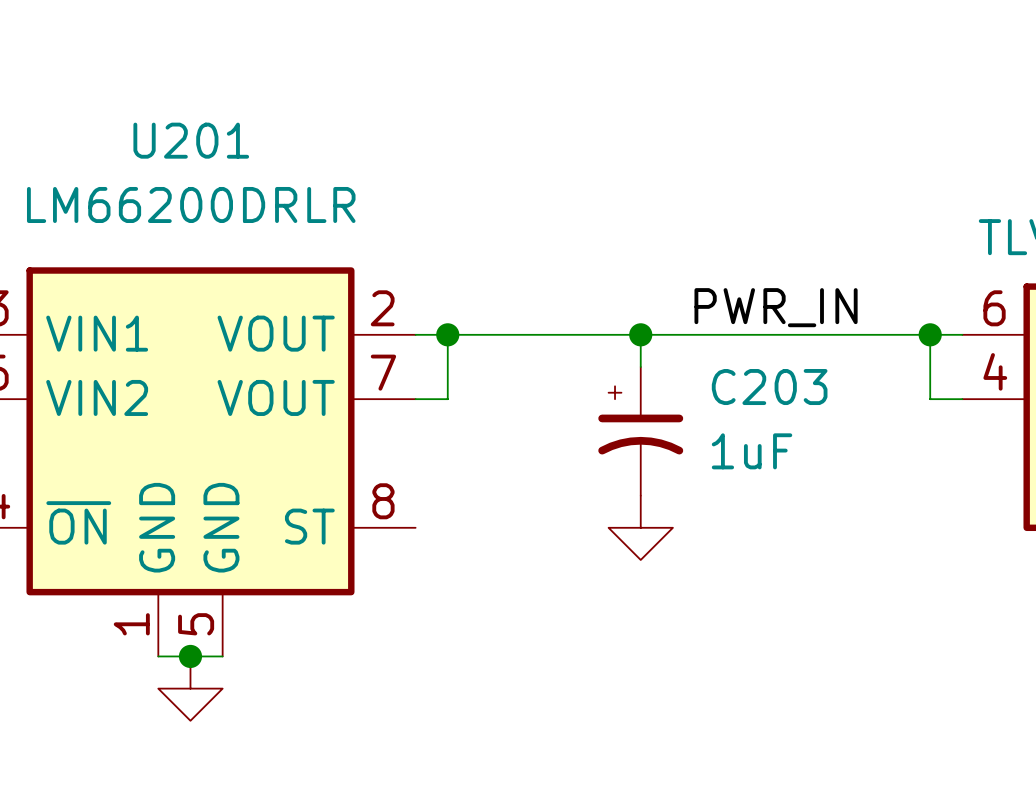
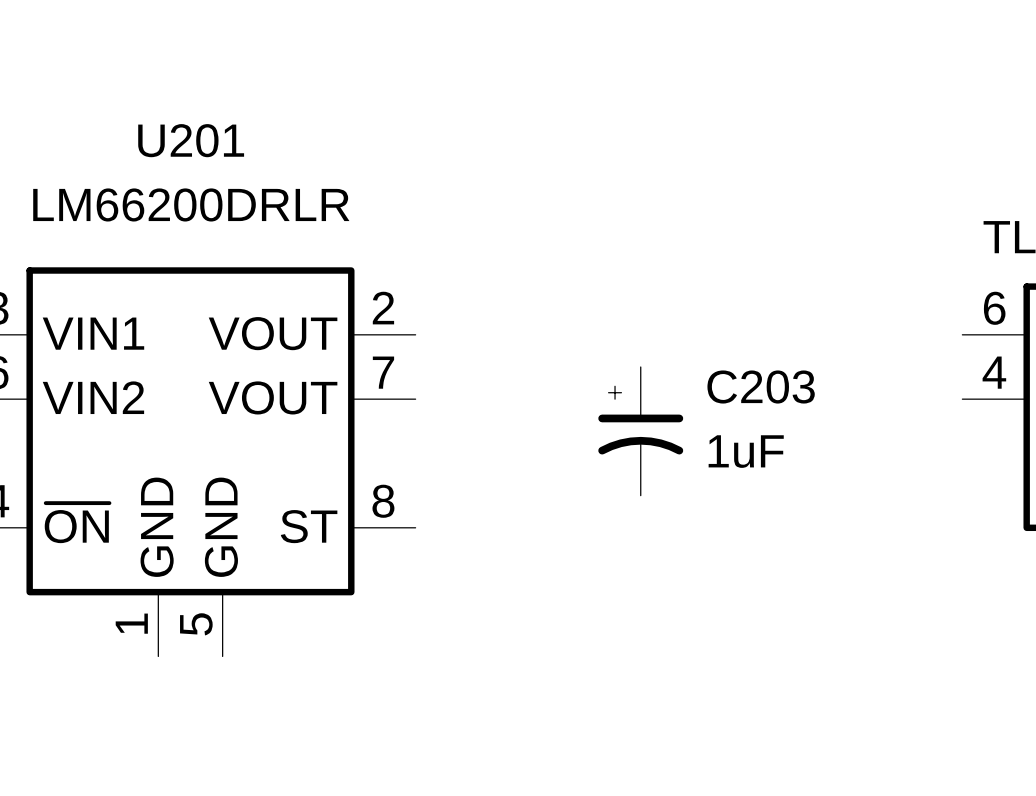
label: PWR_IN (776, 307) -> none
wire: (415, 334) (962, 334) -> none
wire: (447, 334) (447, 399) (415, 399) -> none
junction: (447, 334) -> none
wire: (640, 334) (640, 366) -> none
junction: (640, 334) -> none
wire: (930, 334) (930, 399) (962, 399) -> none
junction: (930, 334) -> none
power symbol: (640, 527) -> none
wire: (158, 656) (222, 656) -> none
junction: (190, 656) -> none
power symbol: (190, 688) -> none

